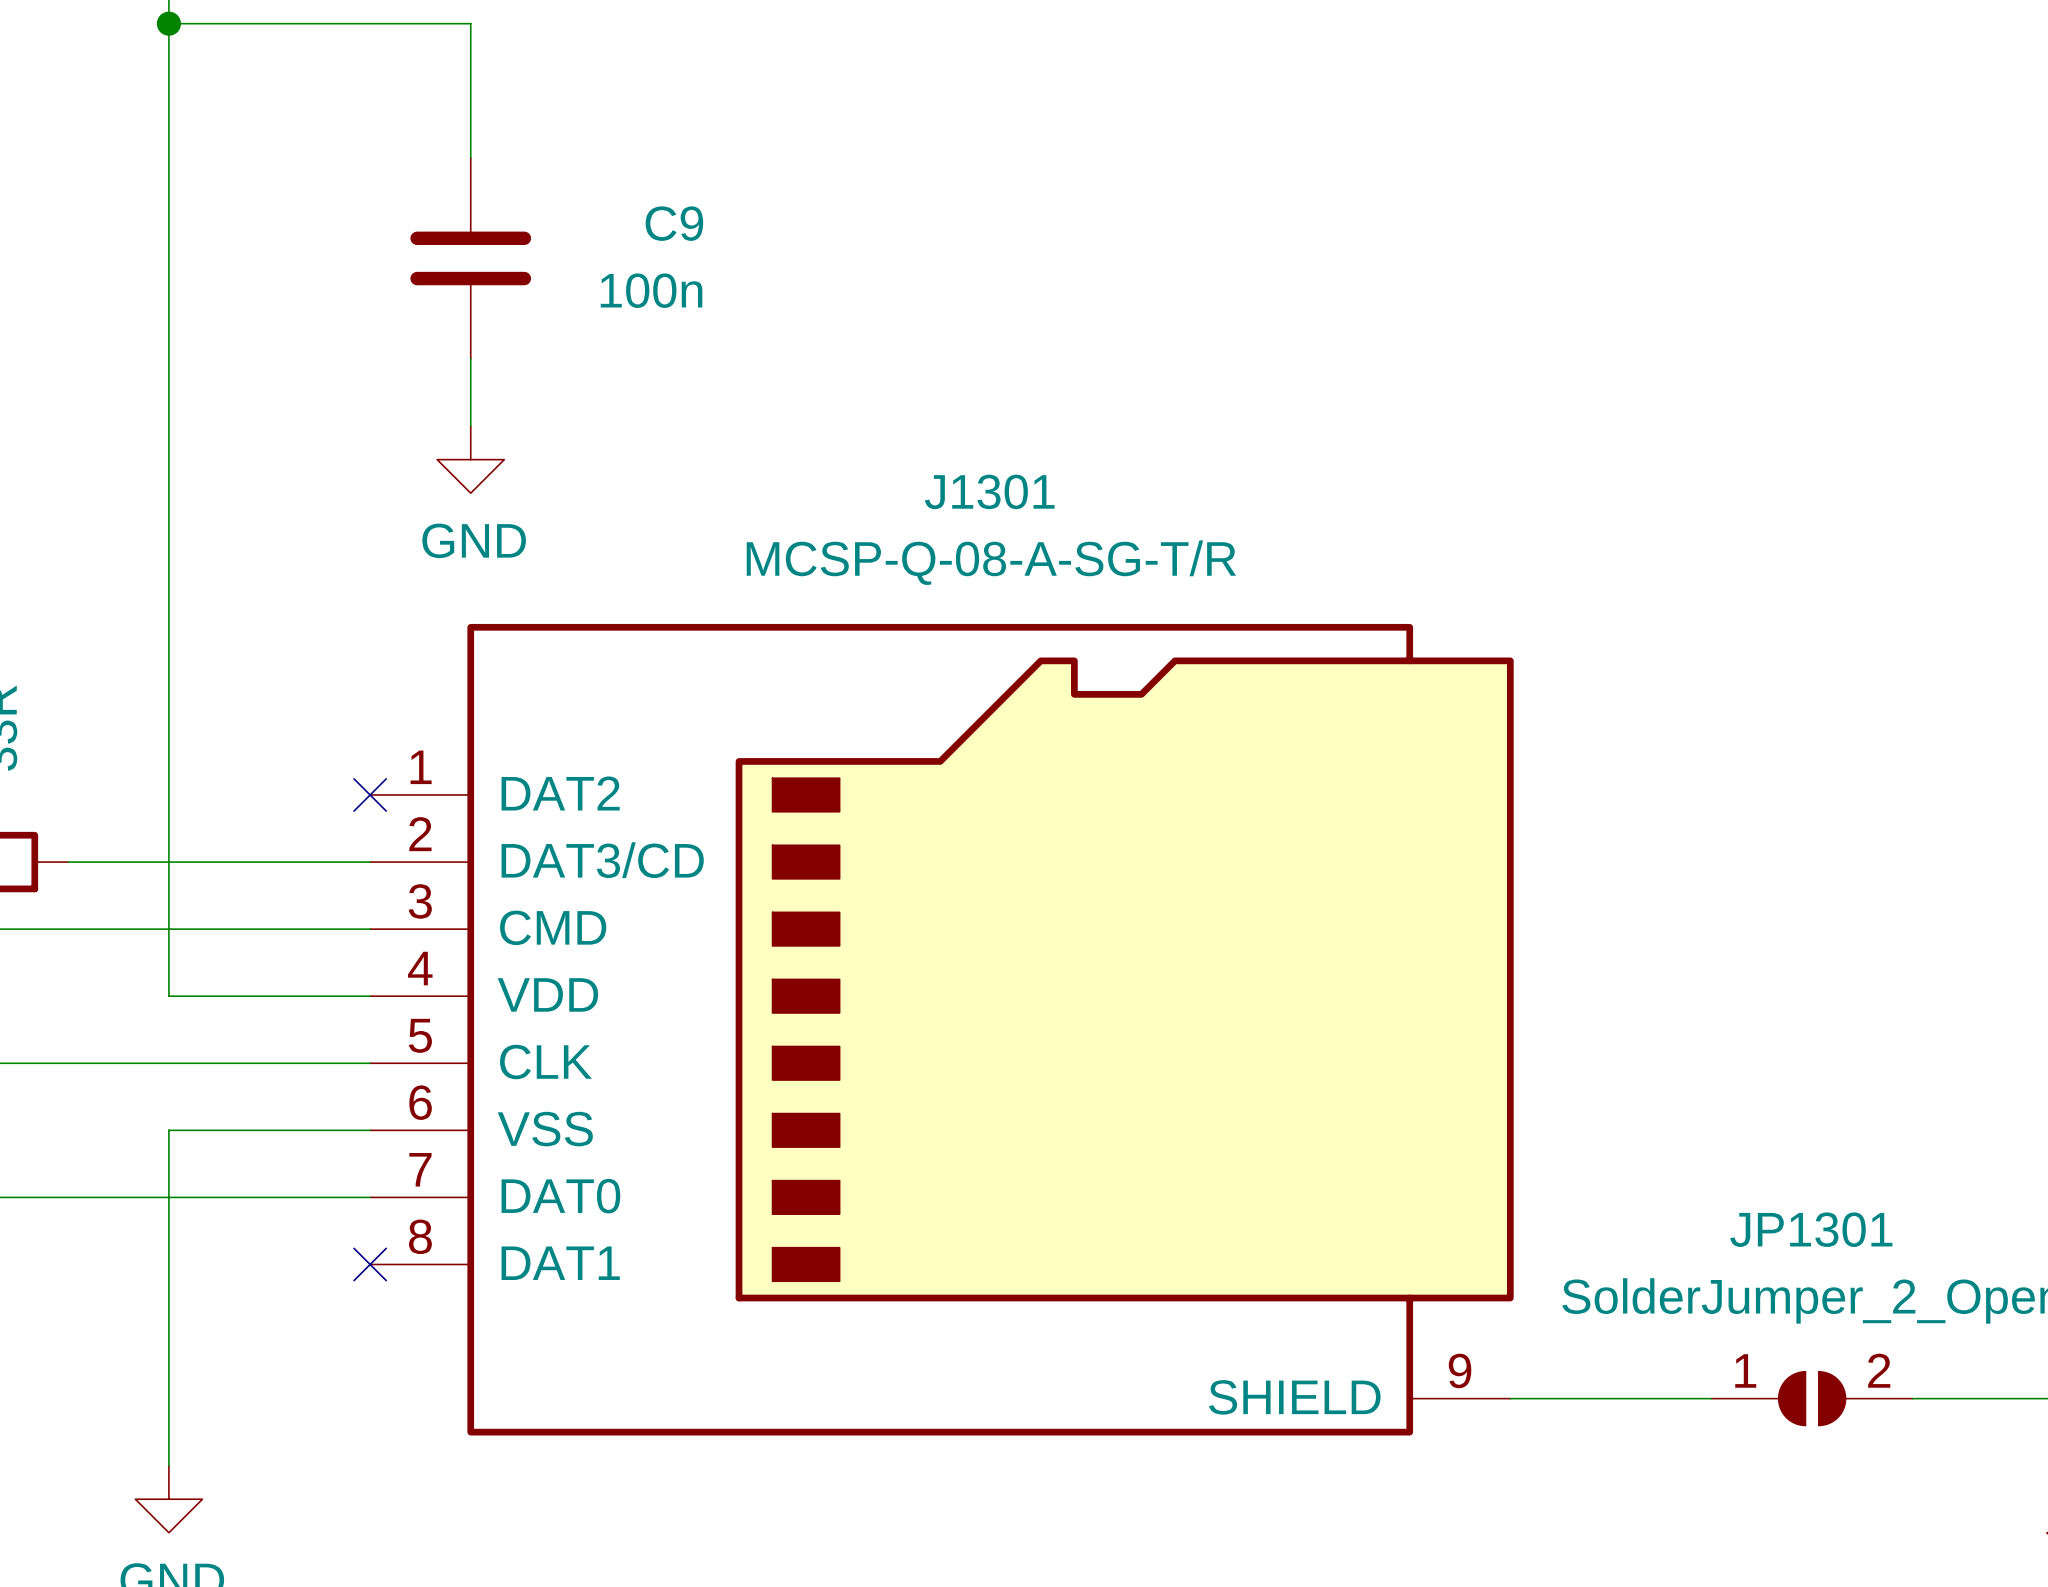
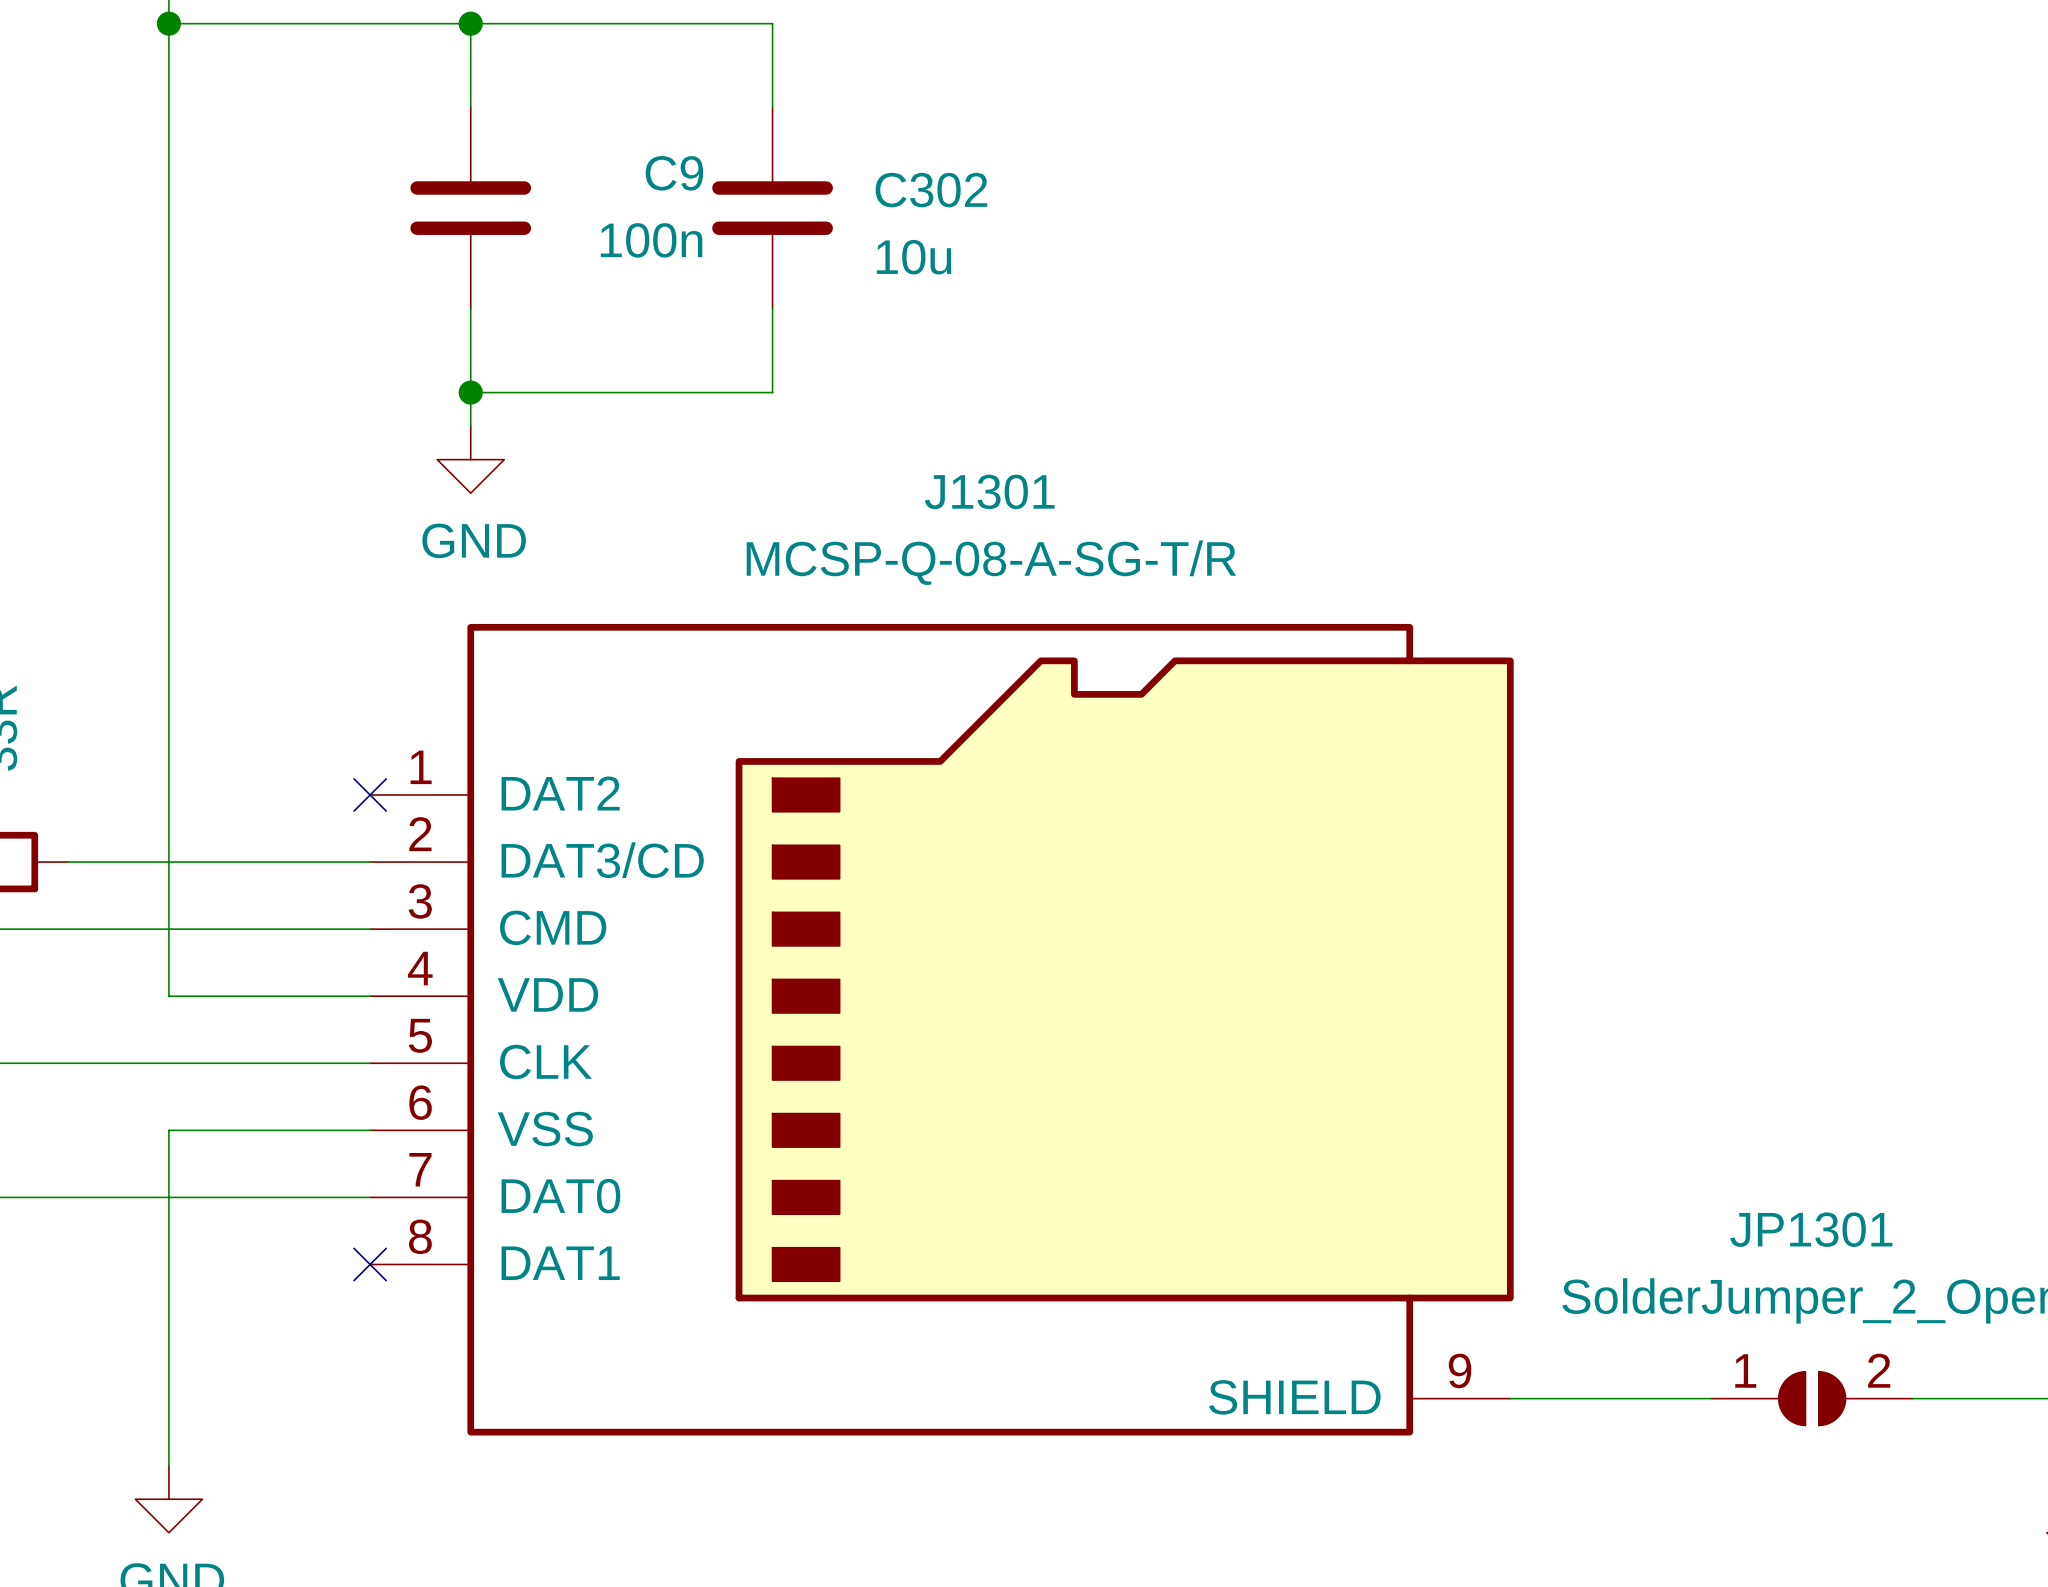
wire: none -> (470, 23) (772, 23) (772, 107)
junction: none -> (470, 23)
C302: none -> 10u (772, 208)
C9 position: (470, 258) -> (470, 208)
wire: none -> (772, 308) (772, 392) (470, 392)
junction: none -> (470, 392)

